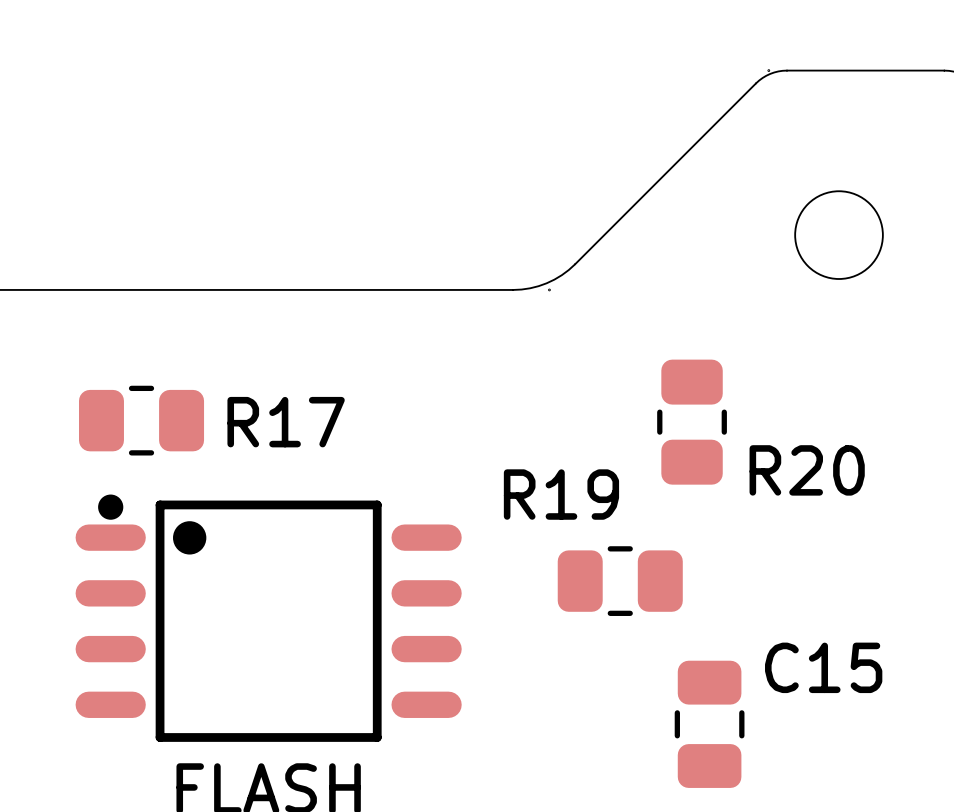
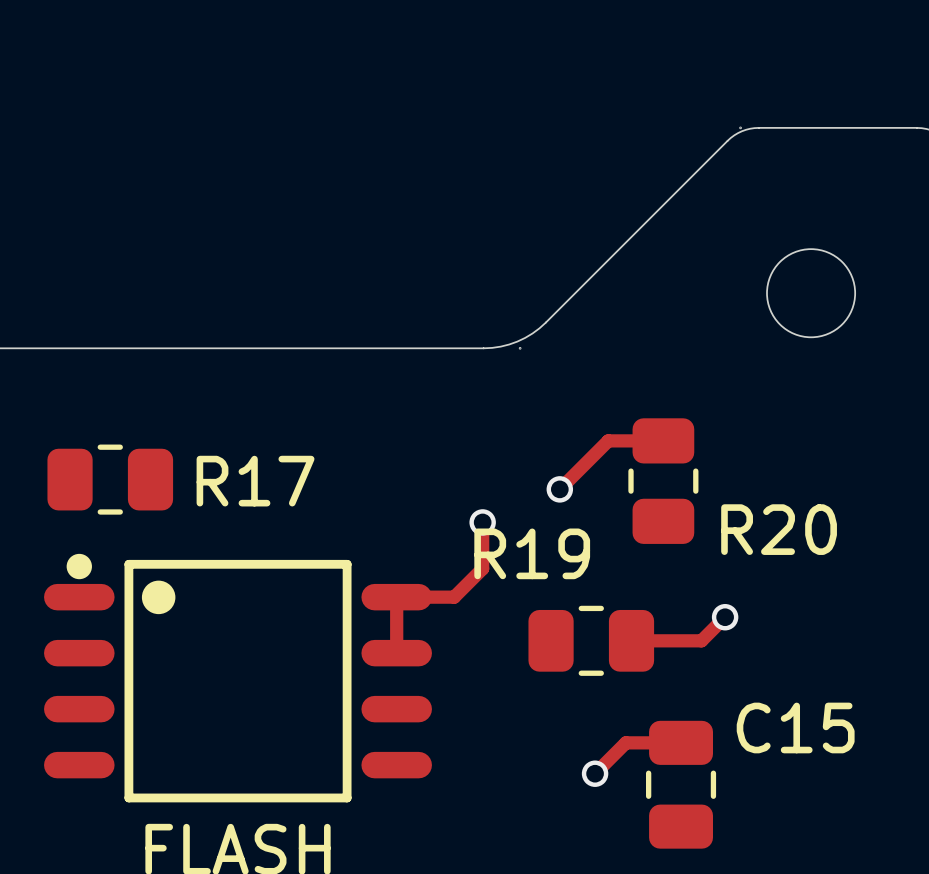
track: none -> (663, 440) (608, 440) (559, 489)
via: none -> (559, 489)
track: none -> (482, 522) (482, 568) (454, 597) (396, 597) (396, 653)
via: none -> (482, 522)
track: none -> (725, 617) (701, 640) (631, 640)
via: none -> (725, 617)
track: none -> (681, 742) (625, 742) (595, 773)
via: none -> (595, 773)

